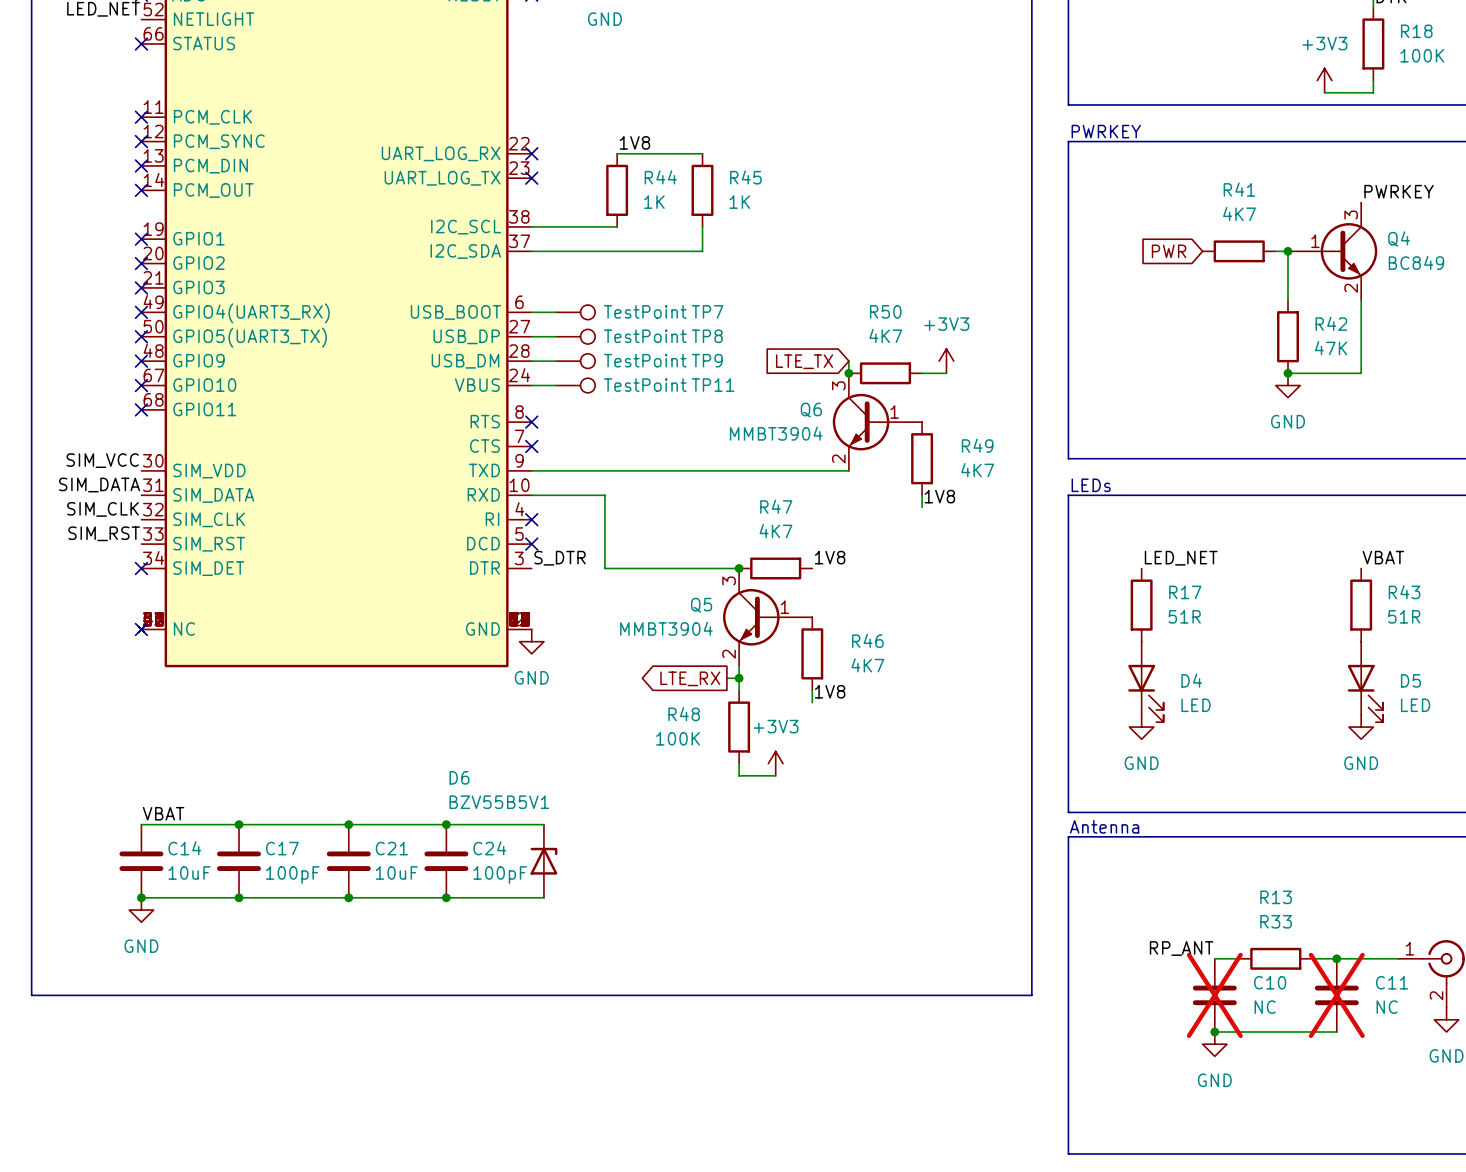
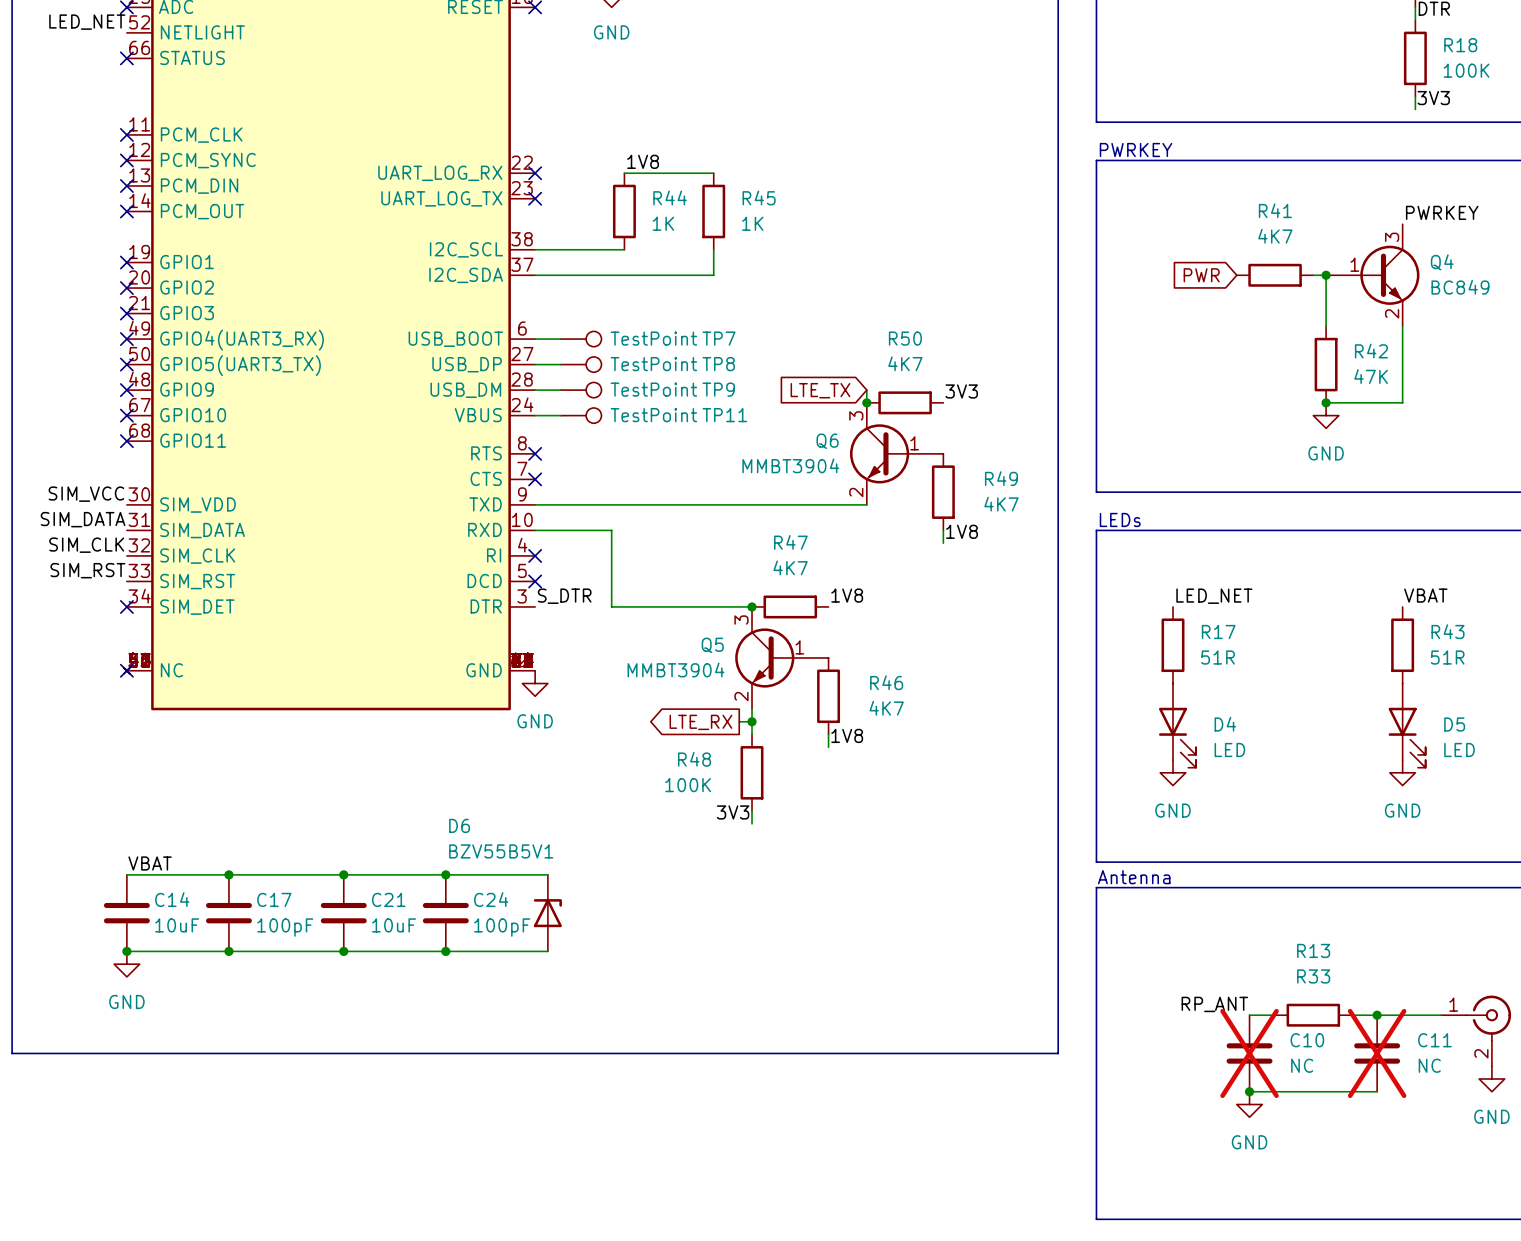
power symbol: +3V3 (1324, 80) -> none
label: none -> 3V3 (1433, 98)
wire: (1324, 92) (1373, 92) -> none
power symbol: +3V3 (946, 361) -> none
label: none -> 3V3 (961, 391)
wire: (922, 373) (946, 373) -> none
power symbol: +3V3 (775, 763) -> none
label: none -> 3V3 (733, 812)
wire: (739, 775) (775, 775) -> none

